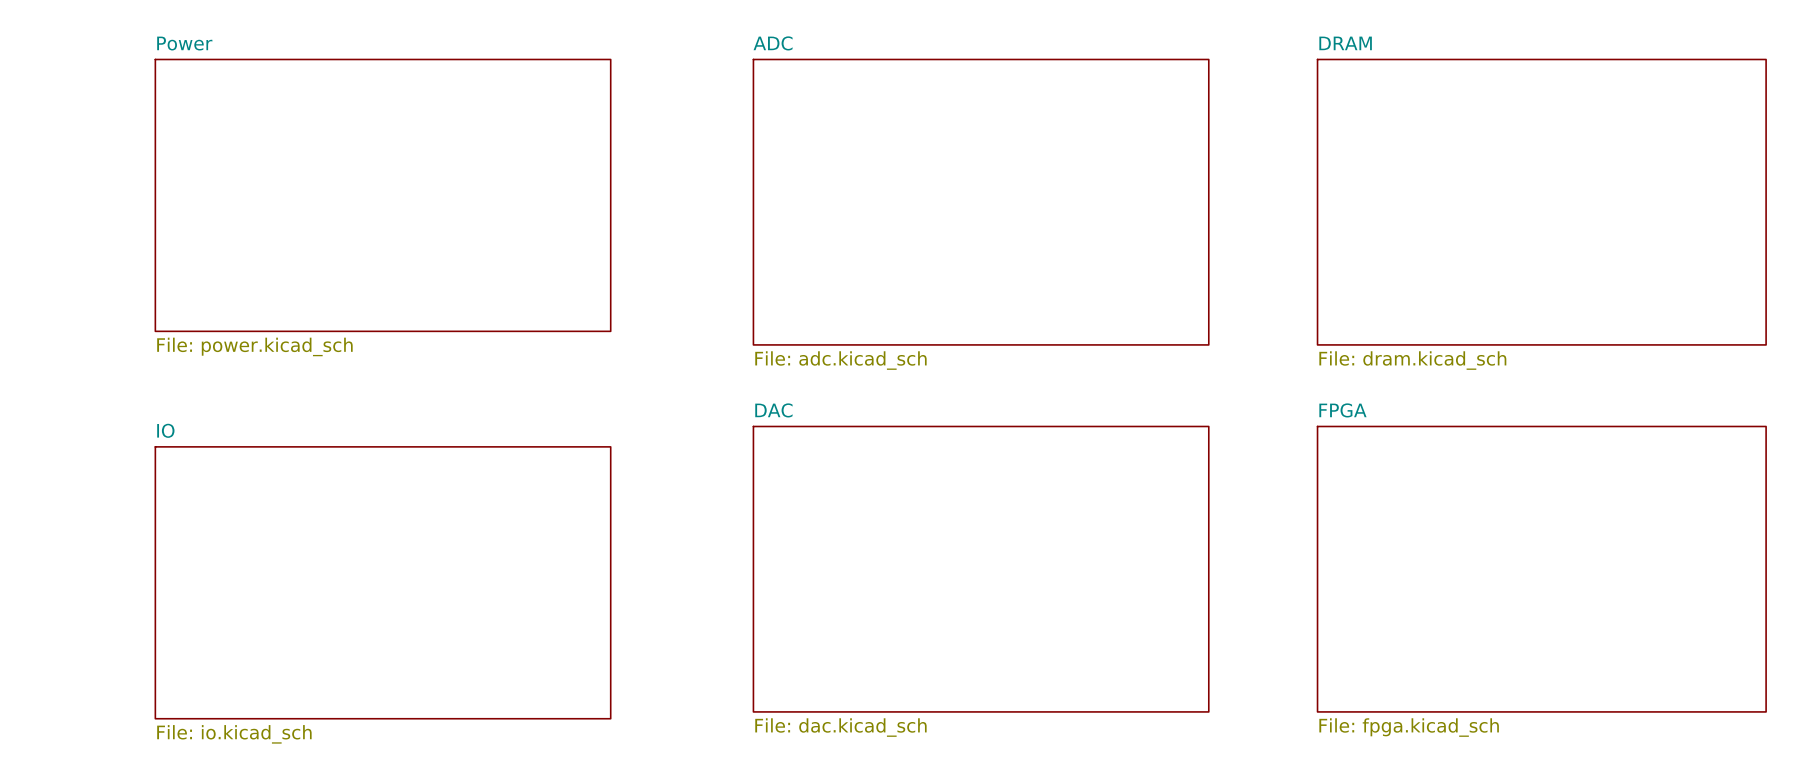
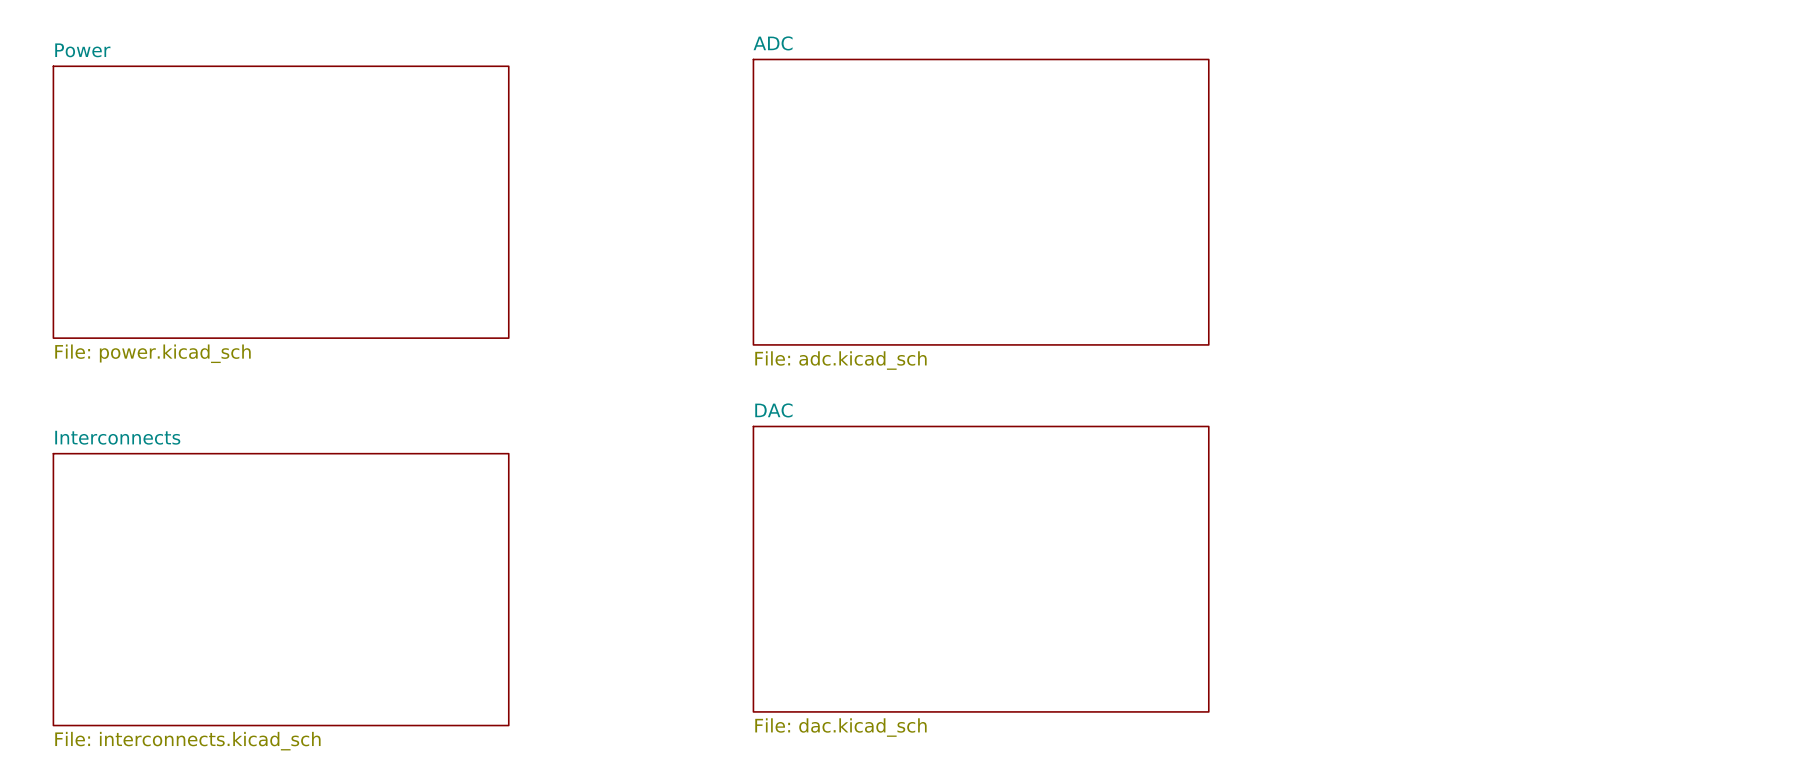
sheet Power position: (383, 195) -> (281, 202)
sheet DRAM: File: dram.kicad_sch (1541, 202) -> none
sheet FPGA: File: fpga.kicad_sch (1541, 569) -> none
sheet IO: File: io.kicad_sch (383, 582) -> none
sheet Interconnects: none -> File: interconnects.kicad_sch (281, 589)

